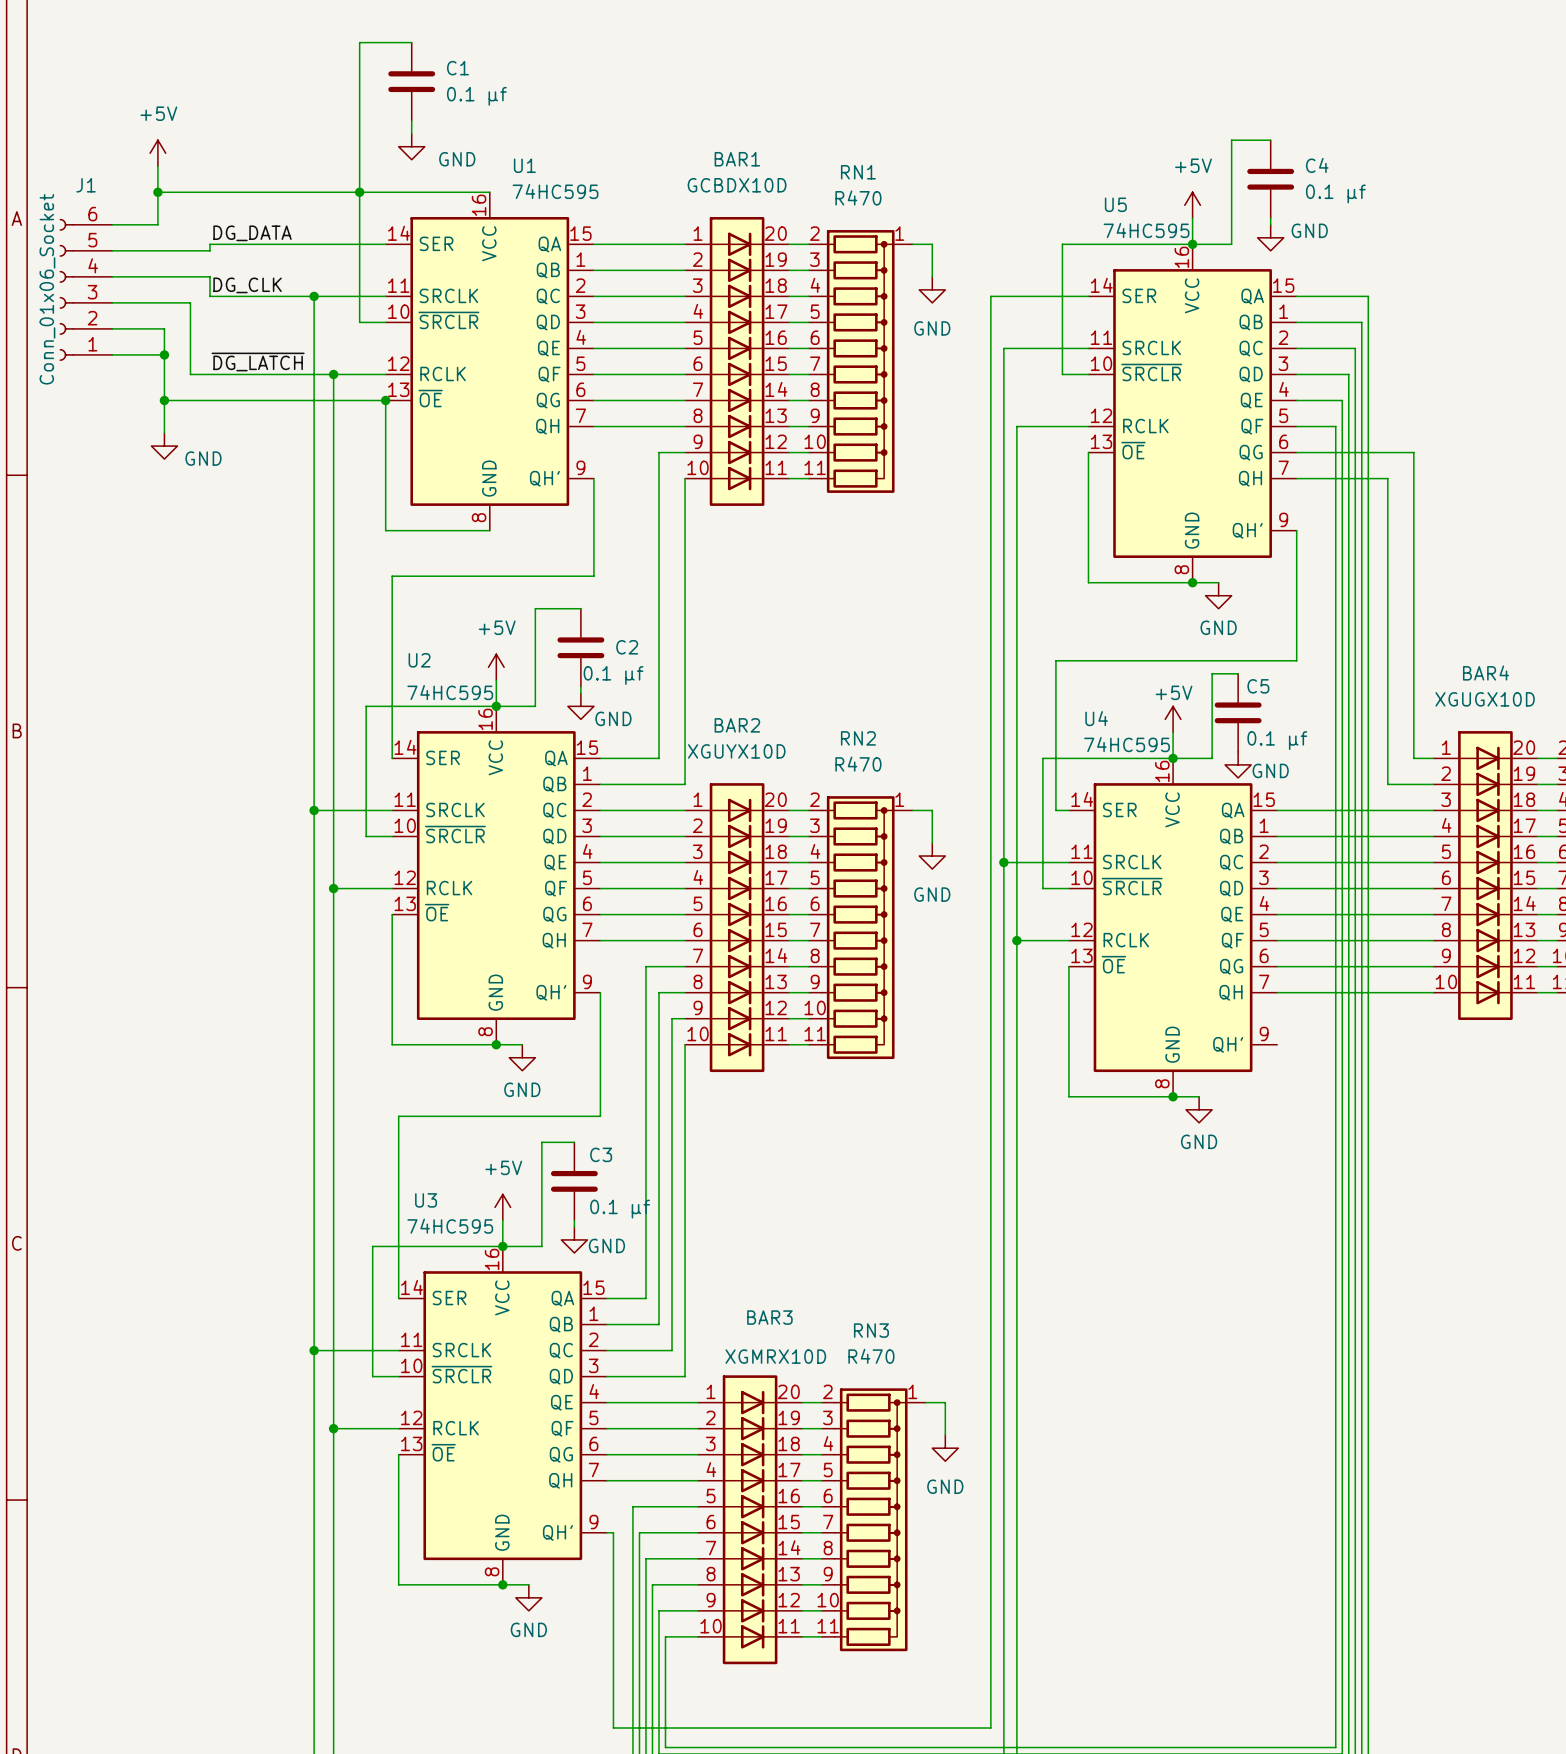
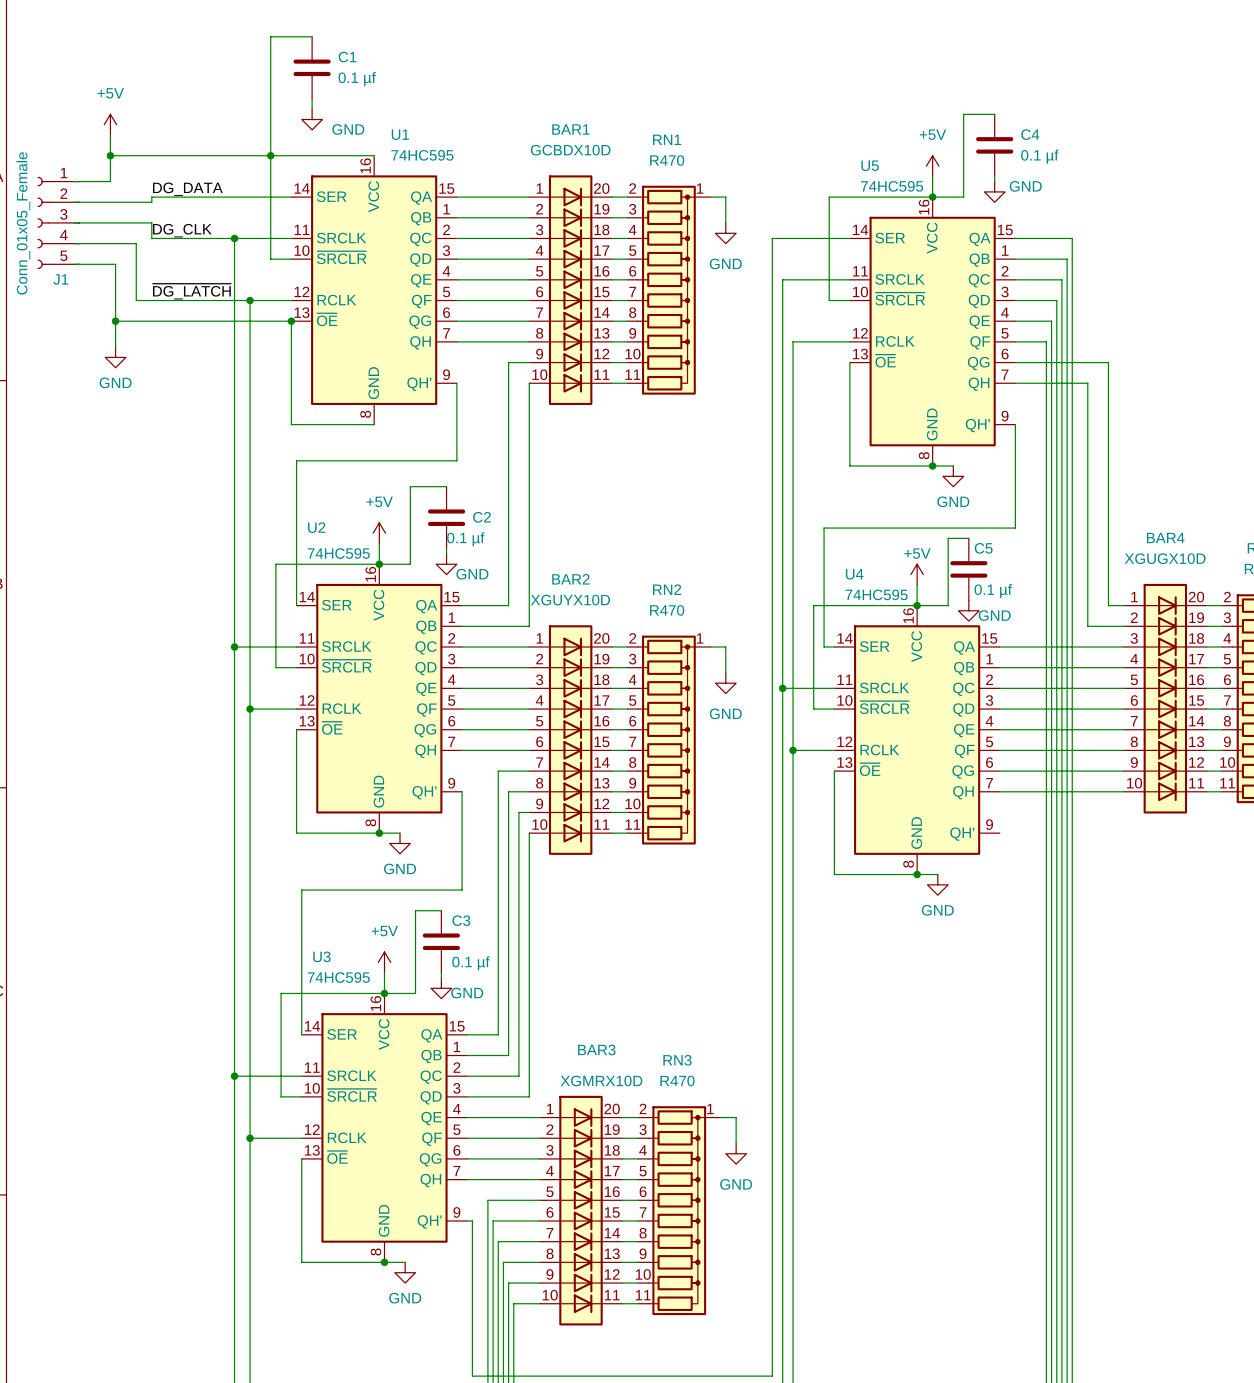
J1 name position: J1 (86, 185) -> J1 (60, 279)
J1 symbol: [59, 218, 113, 361] -> [37, 176, 80, 270]
J1 value: Conn_01x06_Socket (47, 289) -> Conn_01x05_Female (23, 223)
wire: (112, 354) (164, 354) -> none
junction: (164, 354) -> none
power symbol text position: GND (203, 458) -> GND (115, 382)

